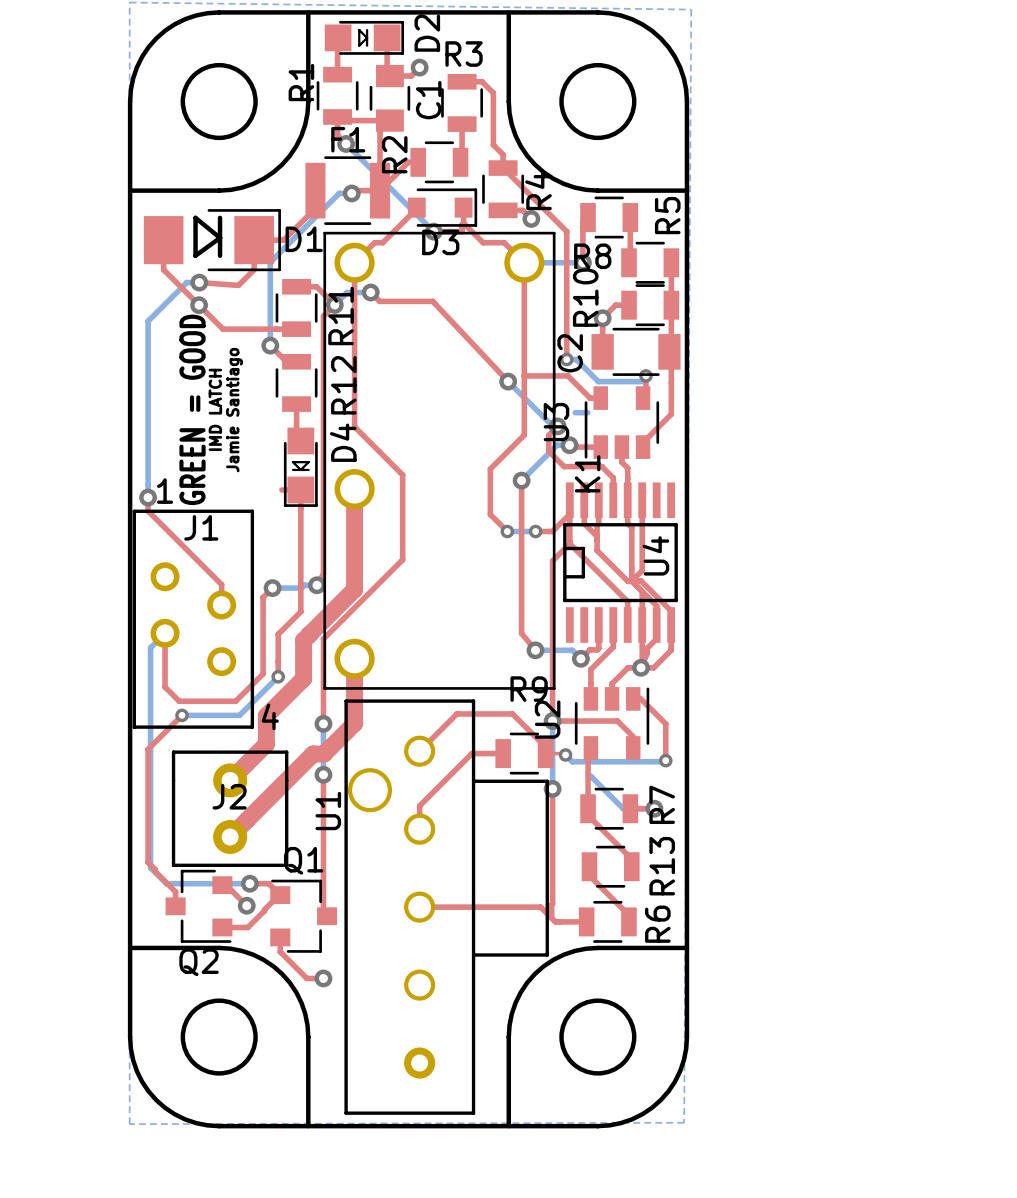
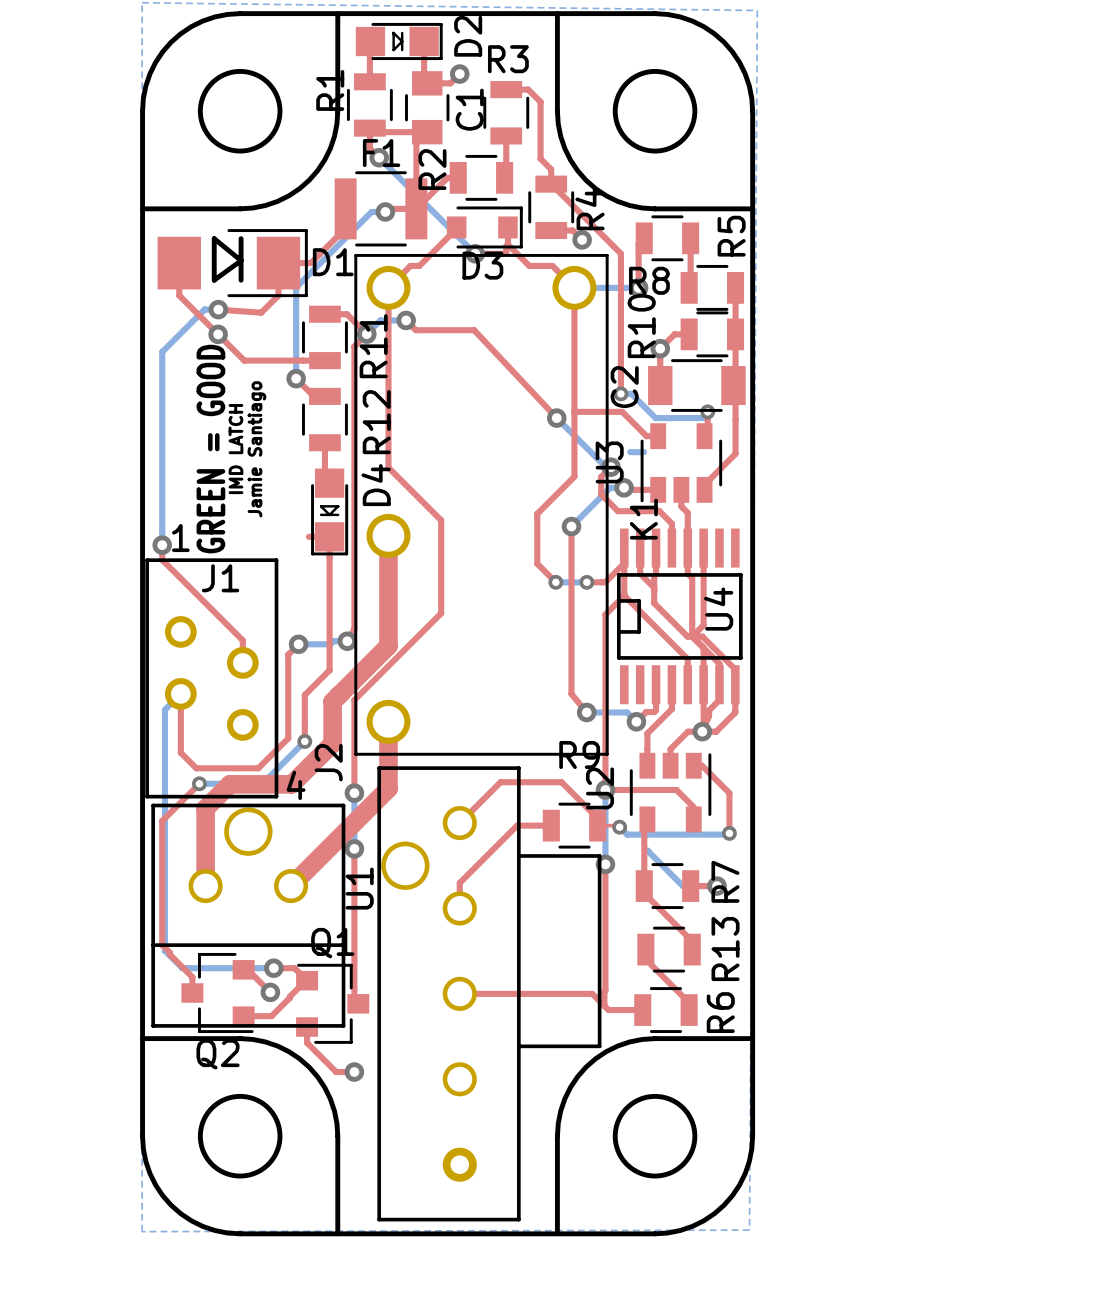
top track: (266, 715) (266, 744) (230, 780) -> (291, 784) (229, 784) (205, 808)
top track: (354, 719) (354, 723) (324, 754) (313, 754) (230, 837) -> (388, 788) (291, 886)
top track: none -> (205, 808) (205, 886)
J2 footprint: [171, 750, 289, 867] -> [151, 803, 346, 1028]
J2 name position: J2 (229, 796) -> J2 (328, 762)

